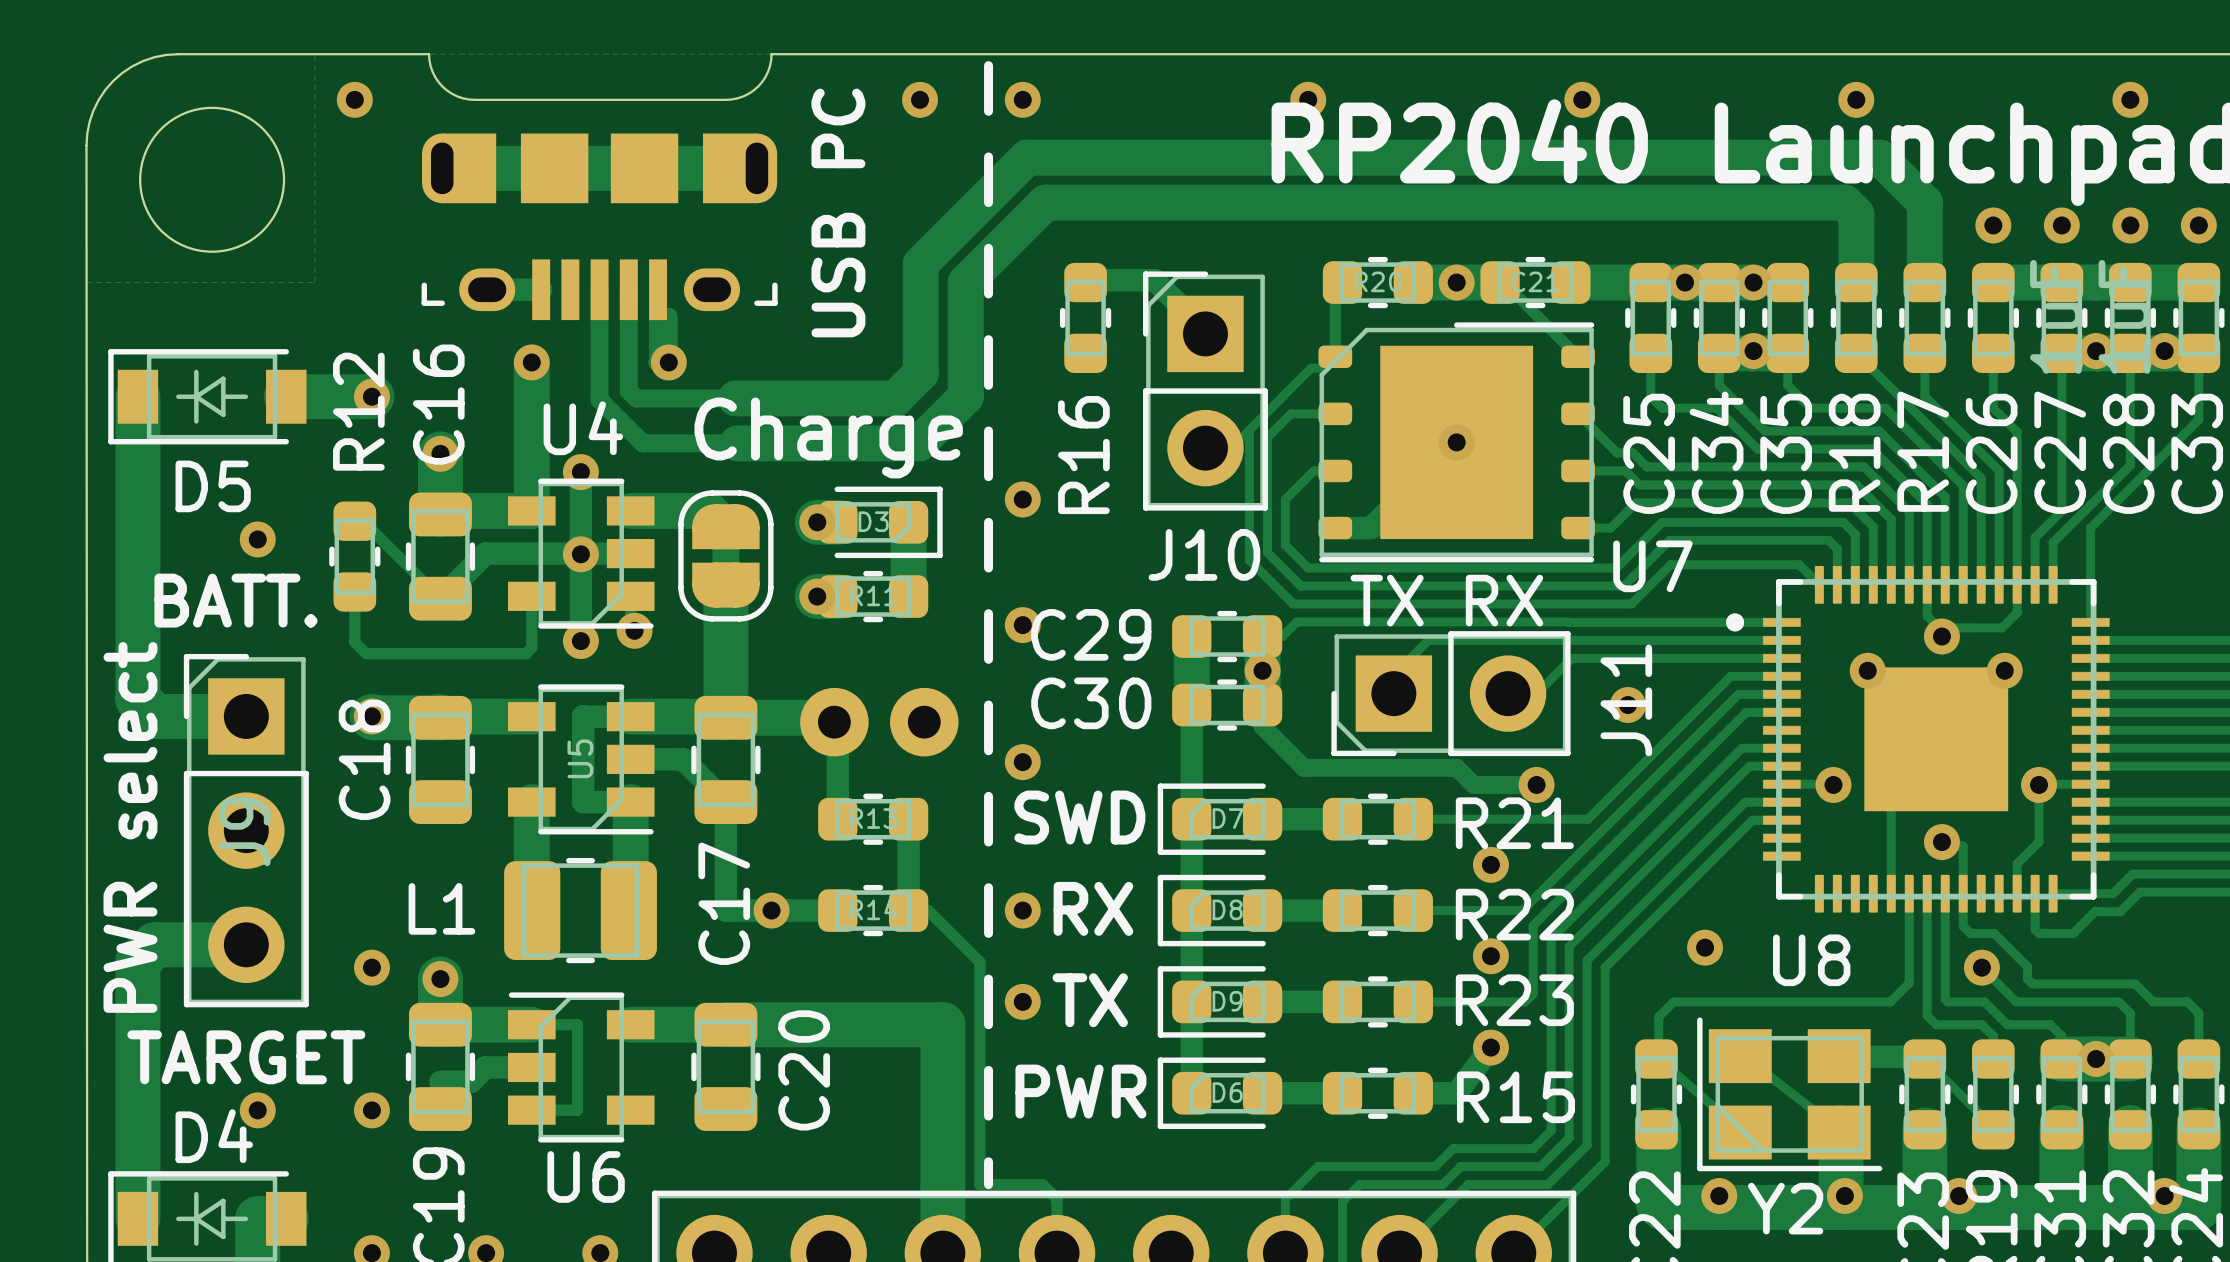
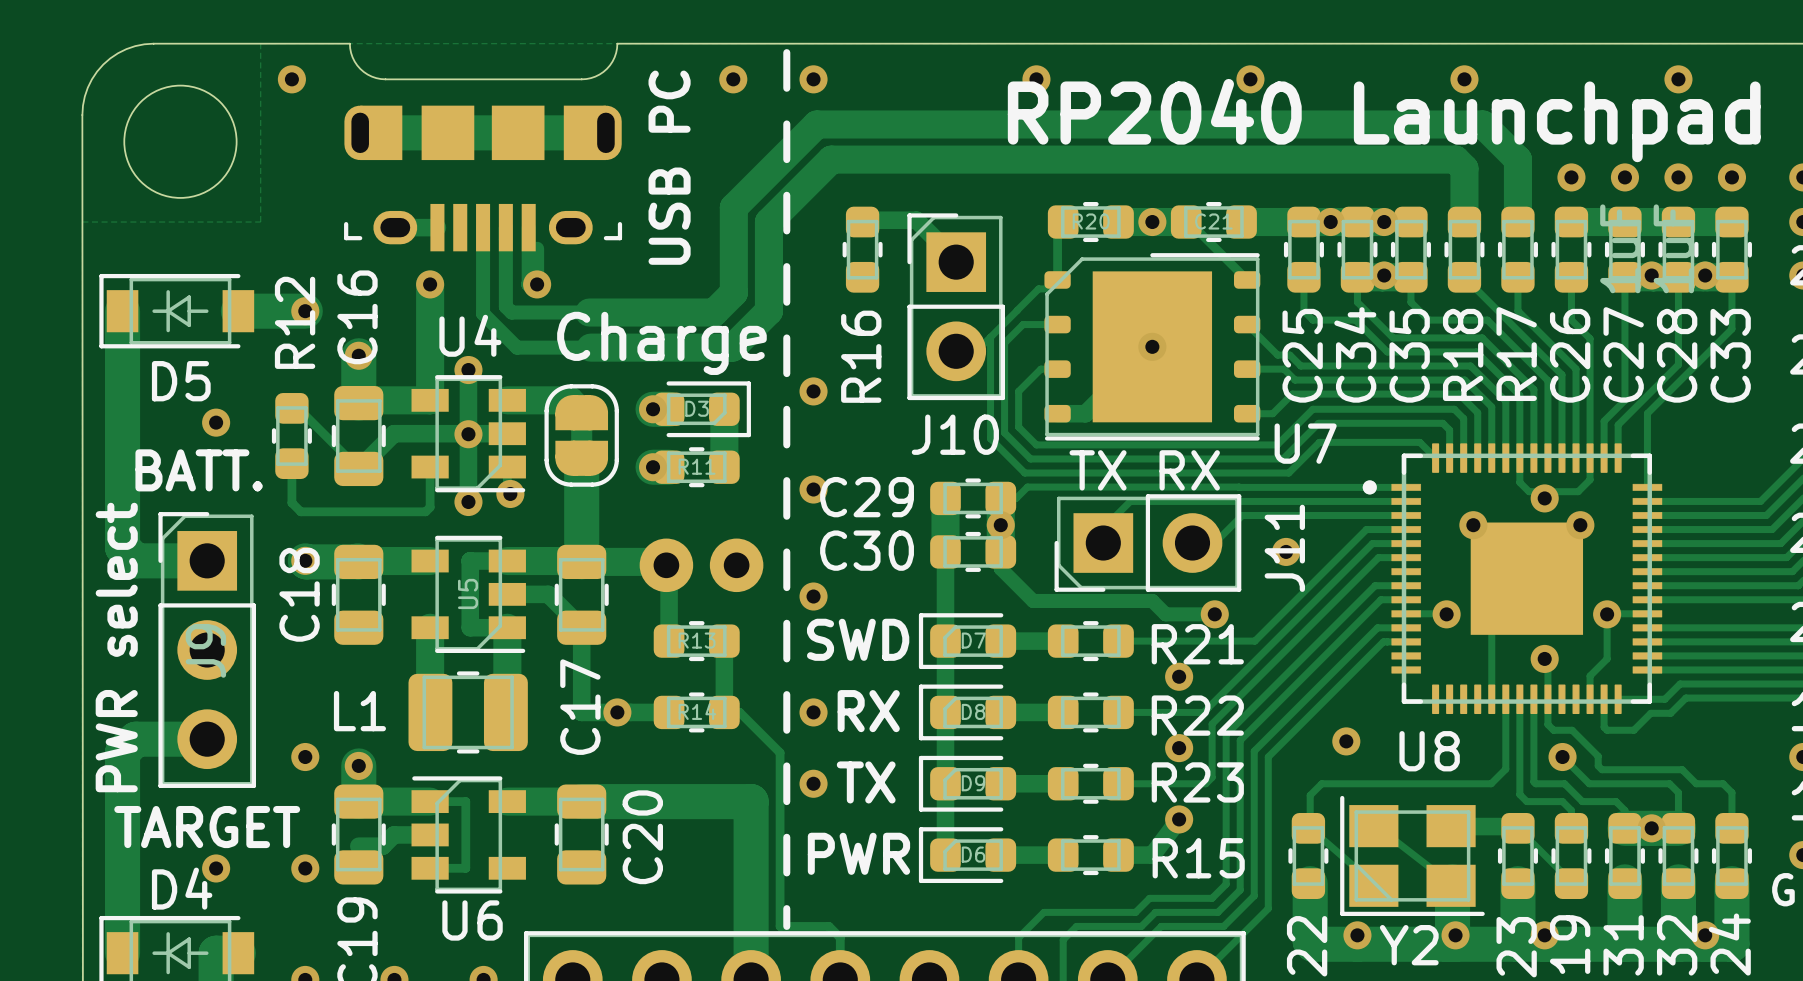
via position: (1941, 636) -> (1544, 498)
via position: (1941, 842) -> (1544, 658)

